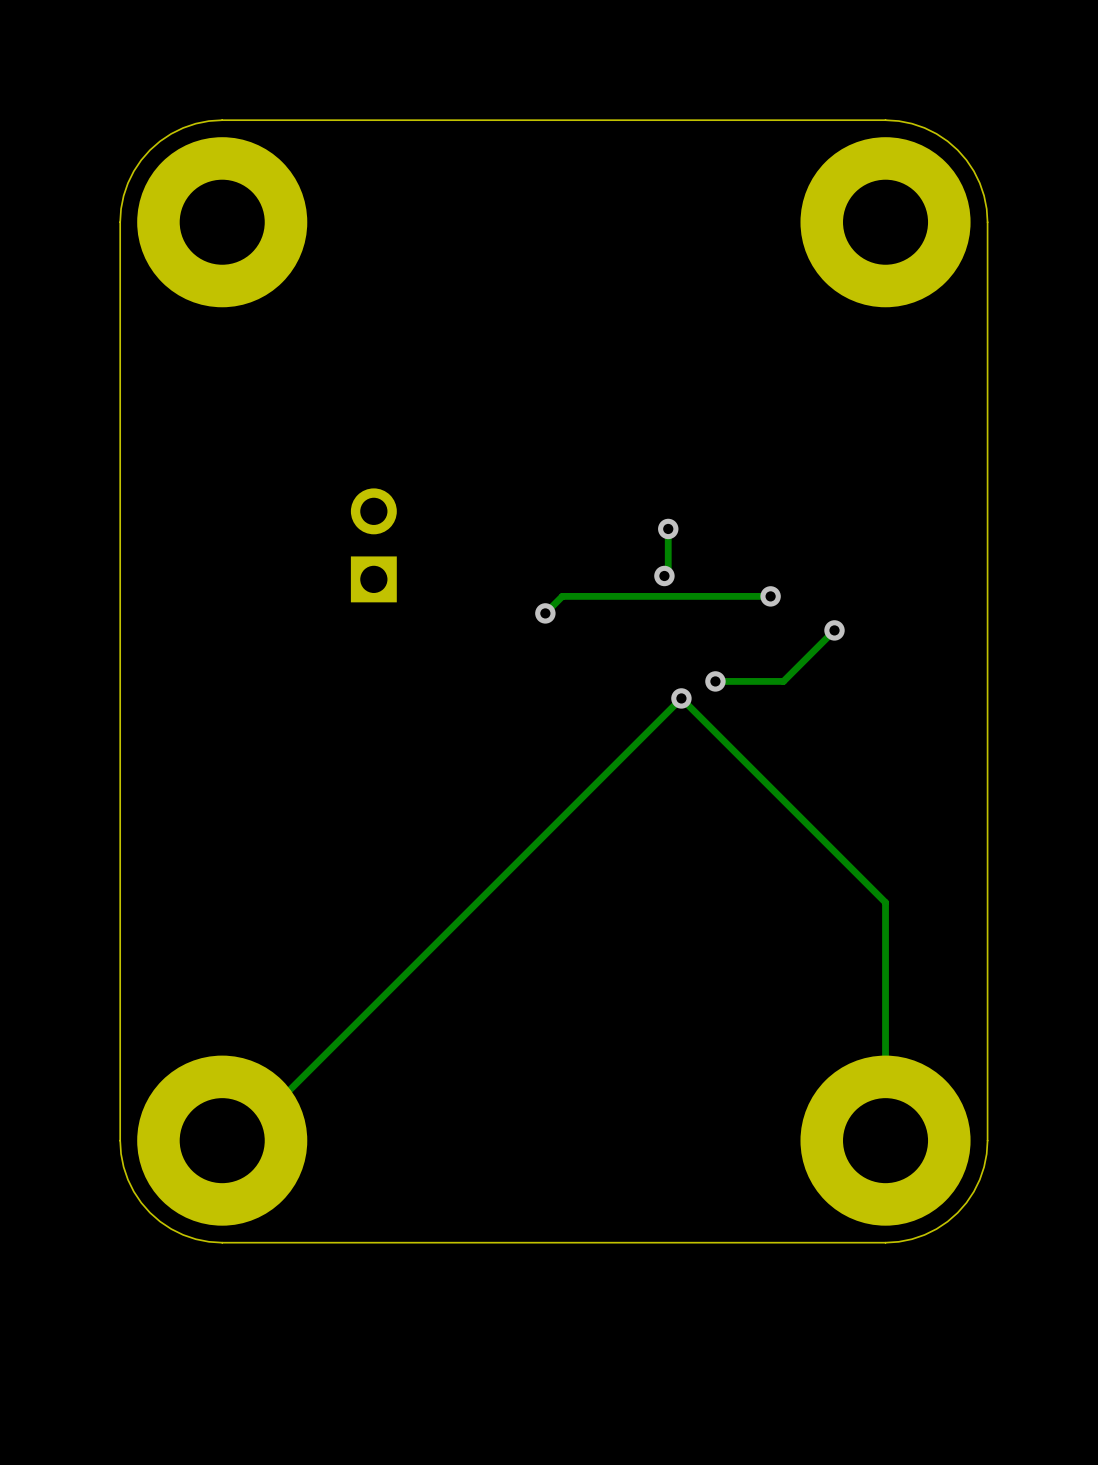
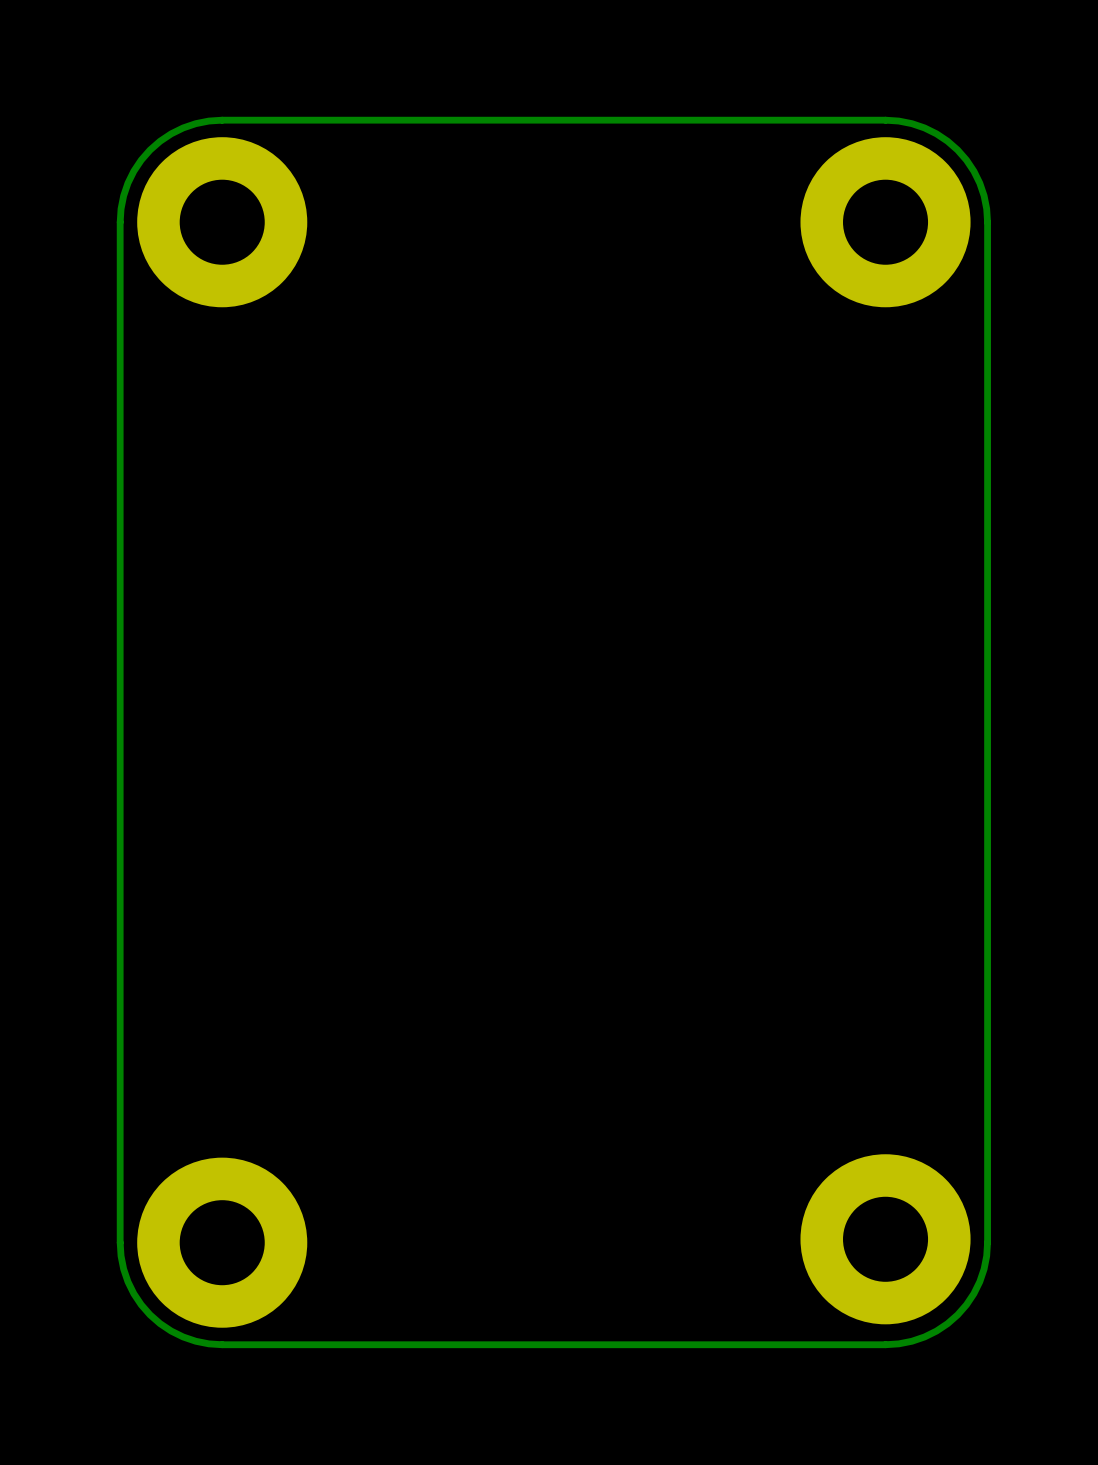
board edge: (885, 120) (208, 121) (183, 127) (160, 141) (141, 160) (133, 171) (123, 195) (120, 222) (120, 1140) (123, 1167) (133, 1191) (150, 1212) (171, 1229) (195, 1239) (222, 1242) (885, 1242) (911, 1239) (936, 1229) (957, 1212) (973, 1191) (984, 1167) (987, 1140) (986, 208) (979, 183) (973, 171) (957, 150) (947, 141) (936, 133) (911, 123) (885, 120) -> none
track: none -> (885, 120) (208, 121) (183, 127) (160, 141) (141, 160) (133, 171) (123, 195) (120, 222) (120, 1242) (123, 1269) (133, 1293) (150, 1314) (171, 1331) (195, 1341) (222, 1344) (885, 1344) (911, 1341) (936, 1331) (957, 1314) (973, 1293) (984, 1269) (987, 1242) (986, 208) (979, 183) (973, 171) (957, 150) (947, 141) (936, 133) (911, 123) (885, 120)
track: (668, 528) (668, 572) (664, 575) -> none
via: (668, 528) -> none
part: (373, 545) -> none
via: (664, 575) -> none
track: (770, 596) (562, 596) (545, 613) -> none
via: (770, 596) -> none
via: (545, 613) -> none
track: (834, 630) (783, 681) (715, 681) -> none
via: (834, 630) -> none
via: (715, 681) -> none
via: (681, 698) -> none
part position: (222, 1140) -> (222, 1242)
track: (885, 1140) (885, 902) (681, 698) (239, 1140) (222, 1140) -> none
part position: (885, 1140) -> (885, 1239)

